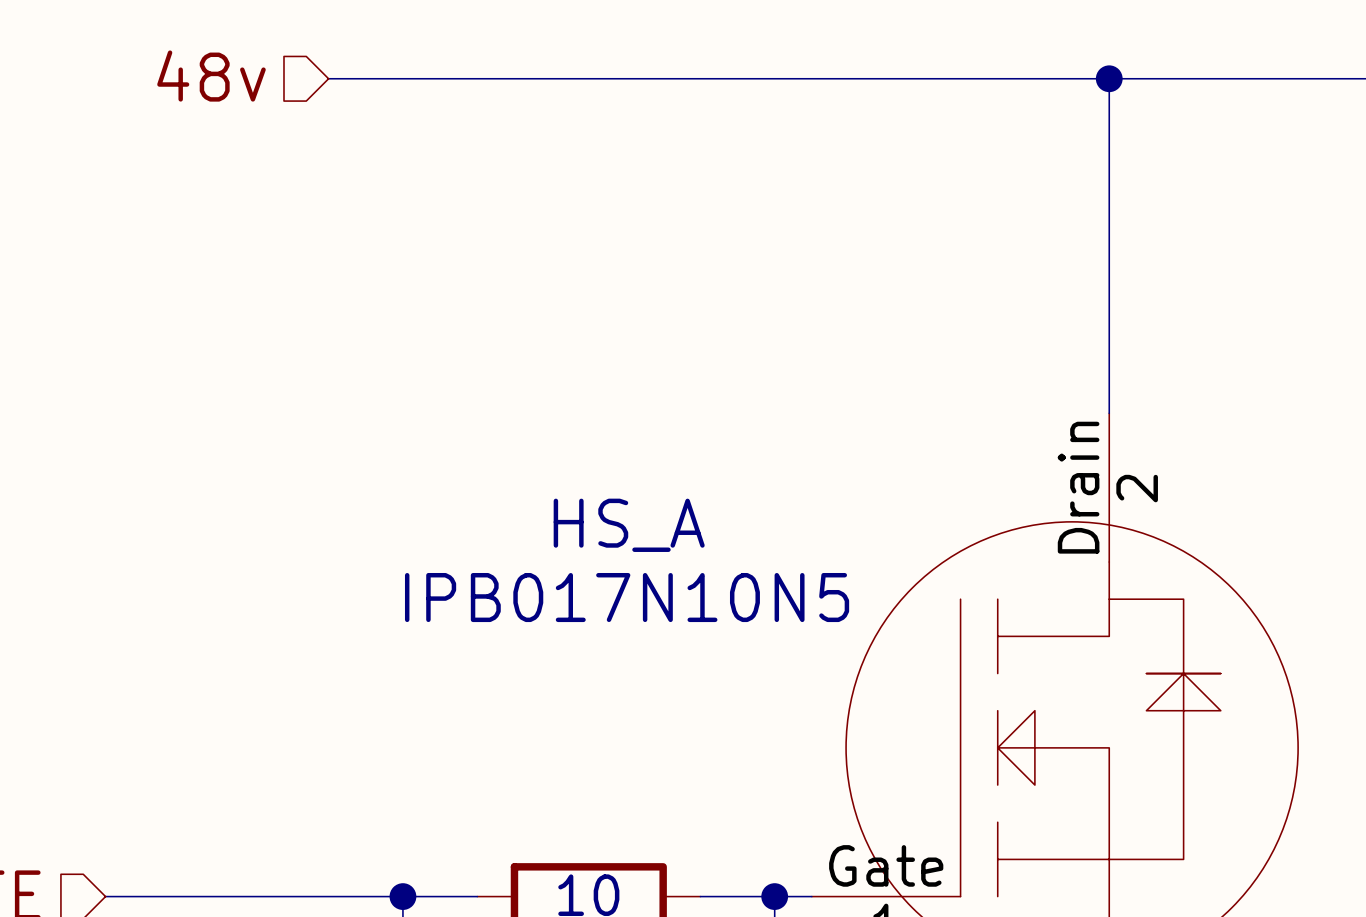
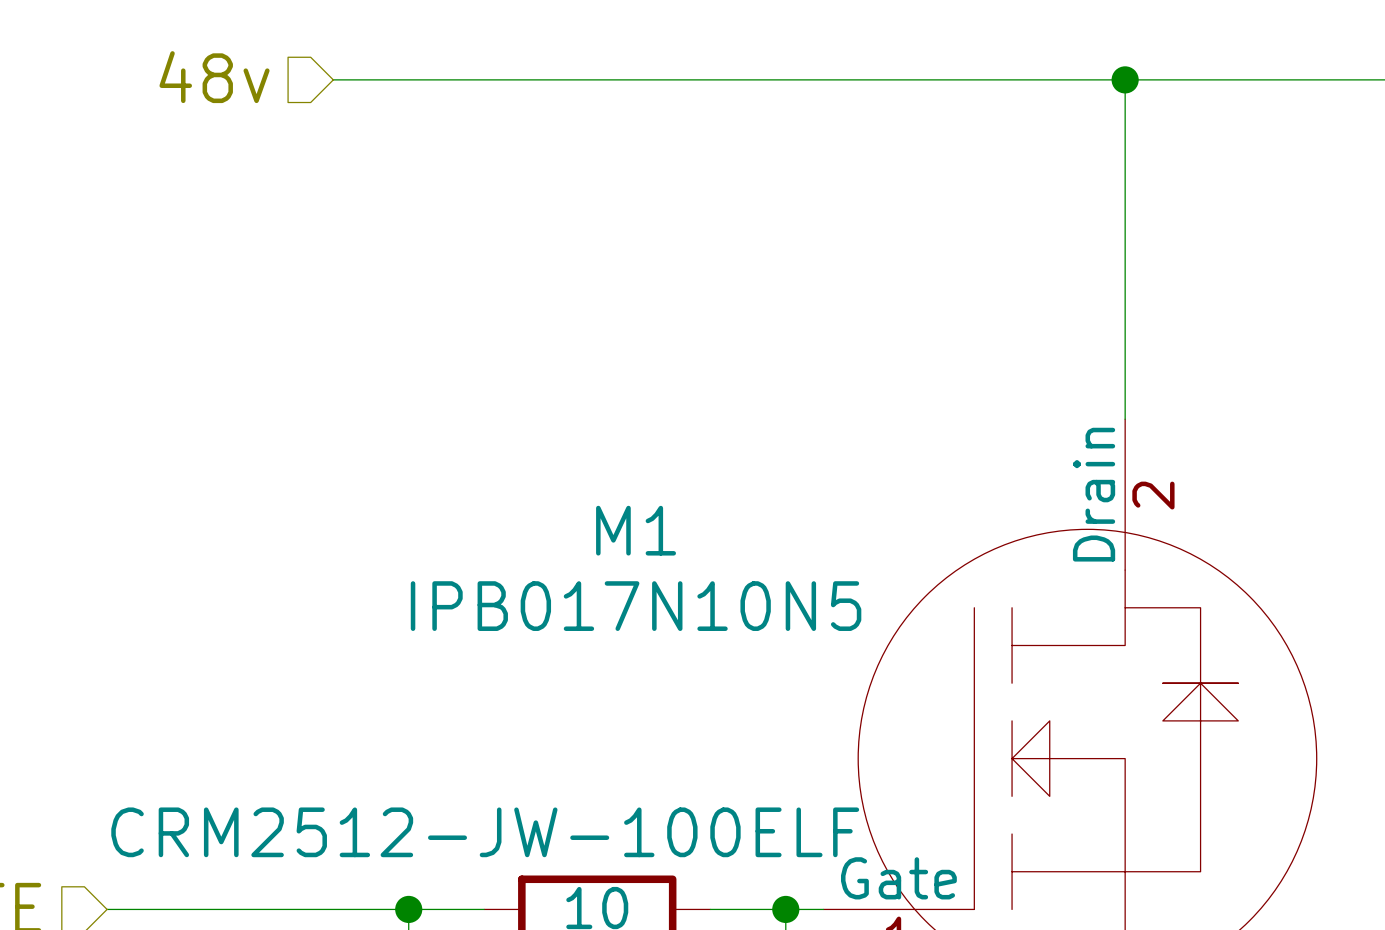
HS_A name: HS_A (629, 525) -> M1 (636, 530)
part text: none -> CRM2512-JW-100ELF (485, 832)

